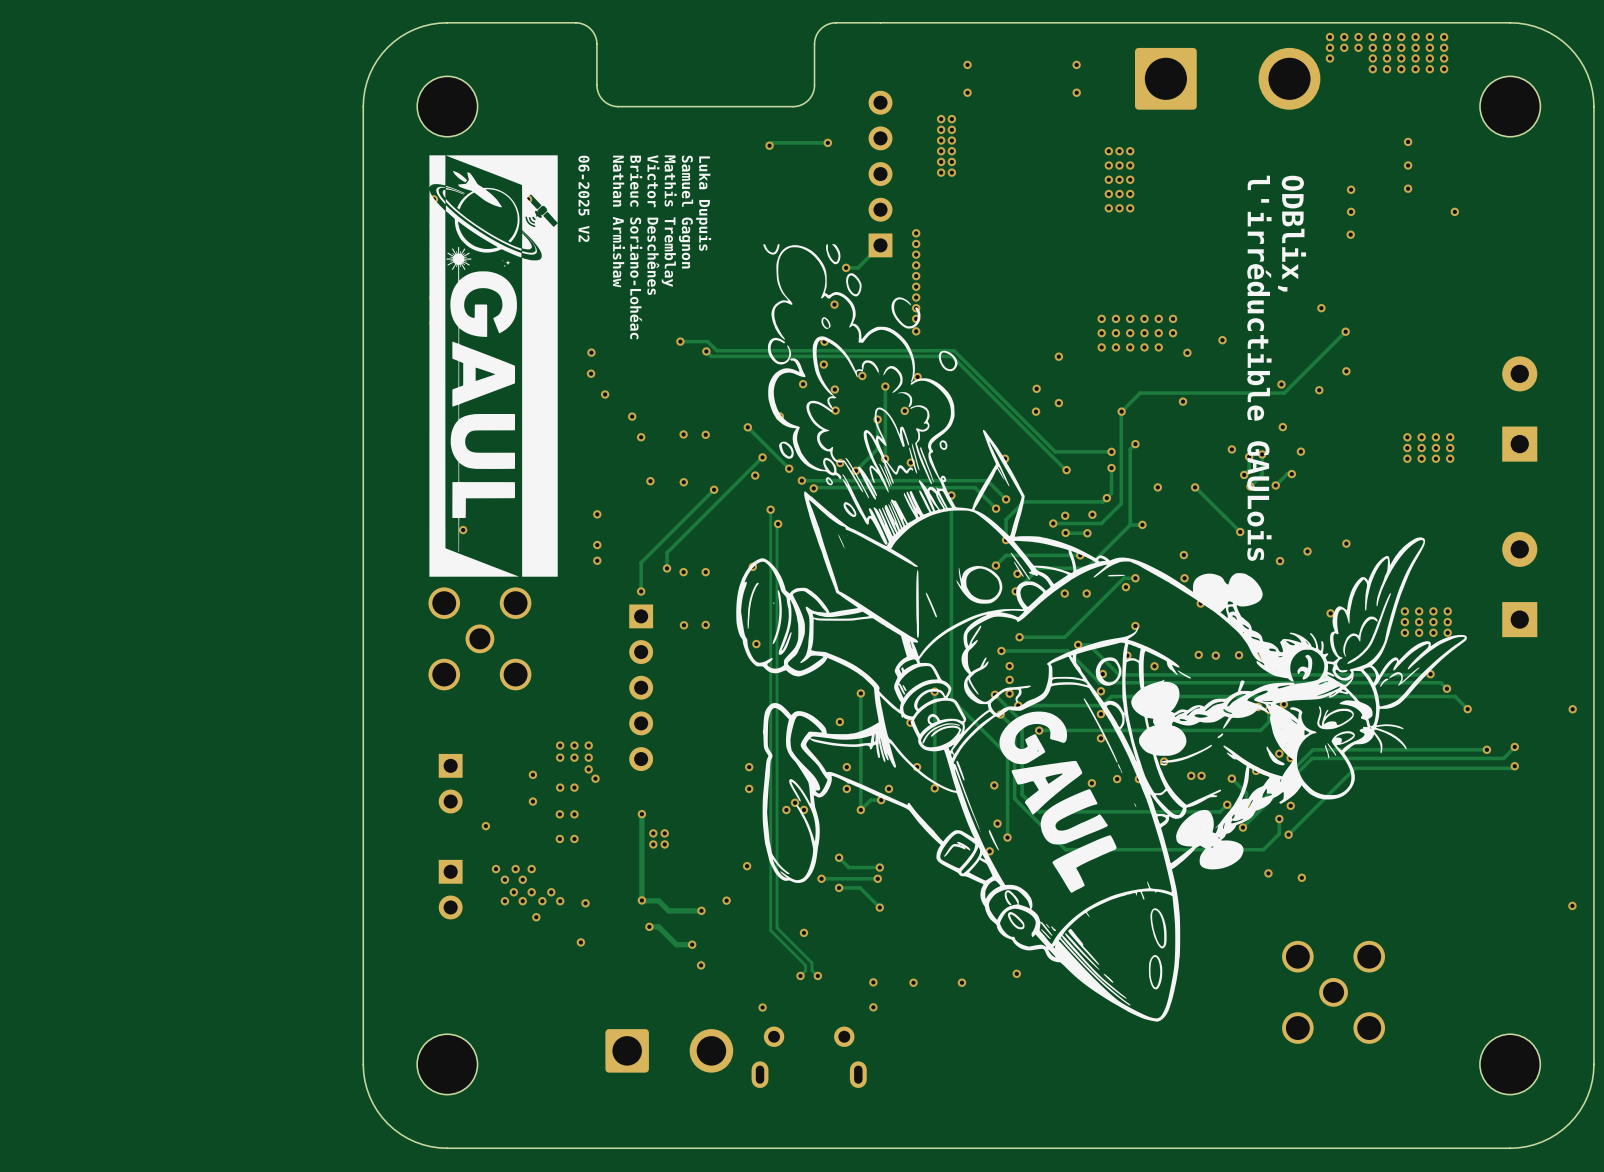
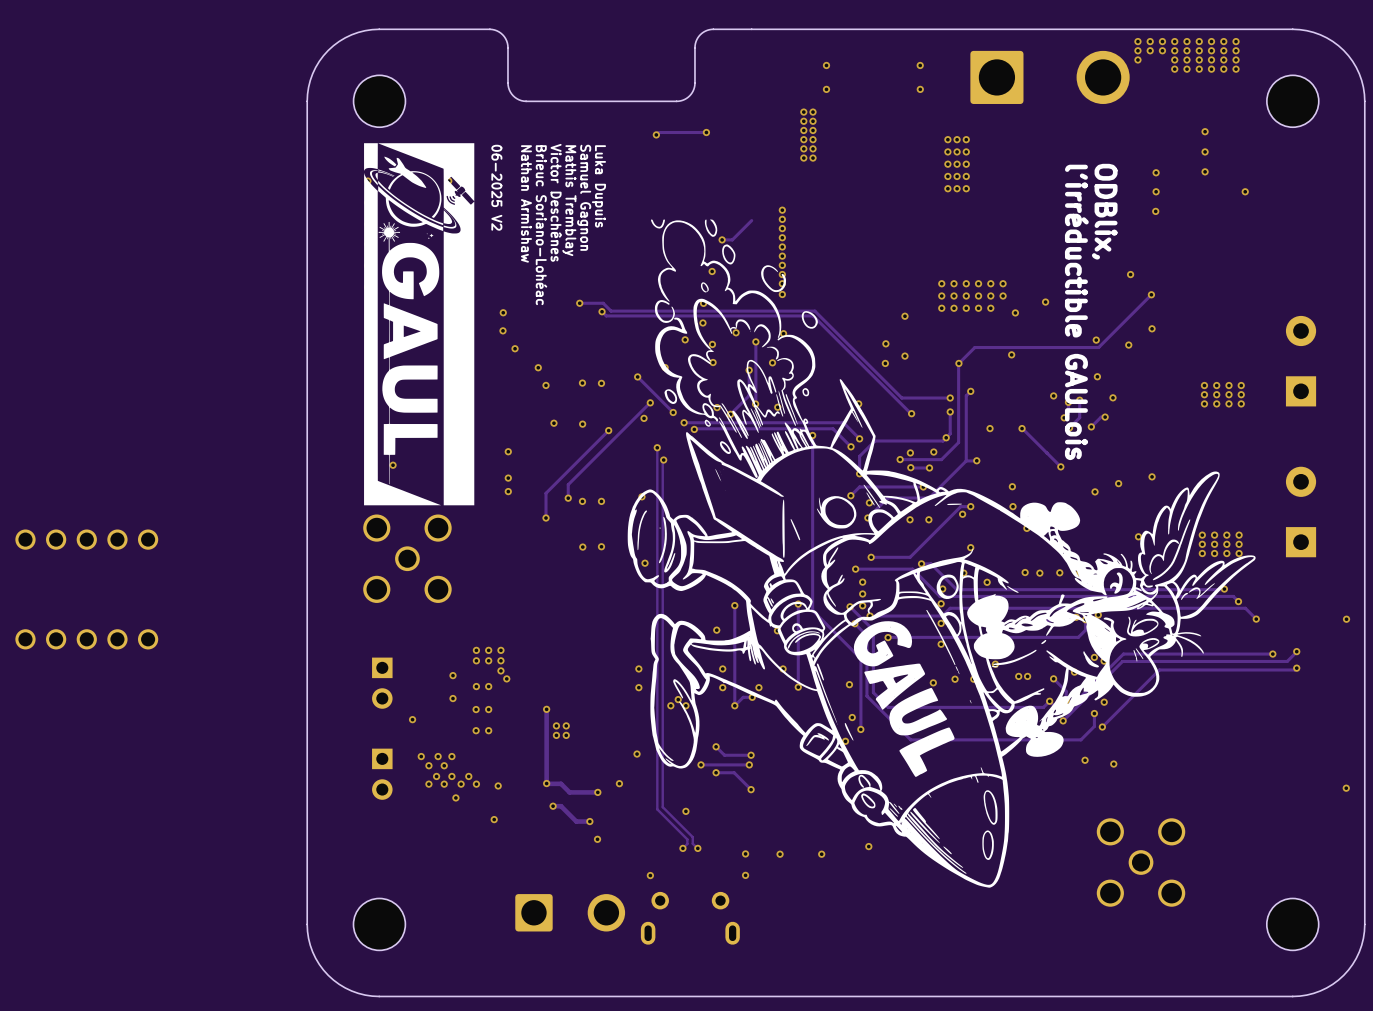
part: (880, 174) -> none
part: none -> (86, 539)
part: (641, 687) -> none
part: none -> (86, 639)

